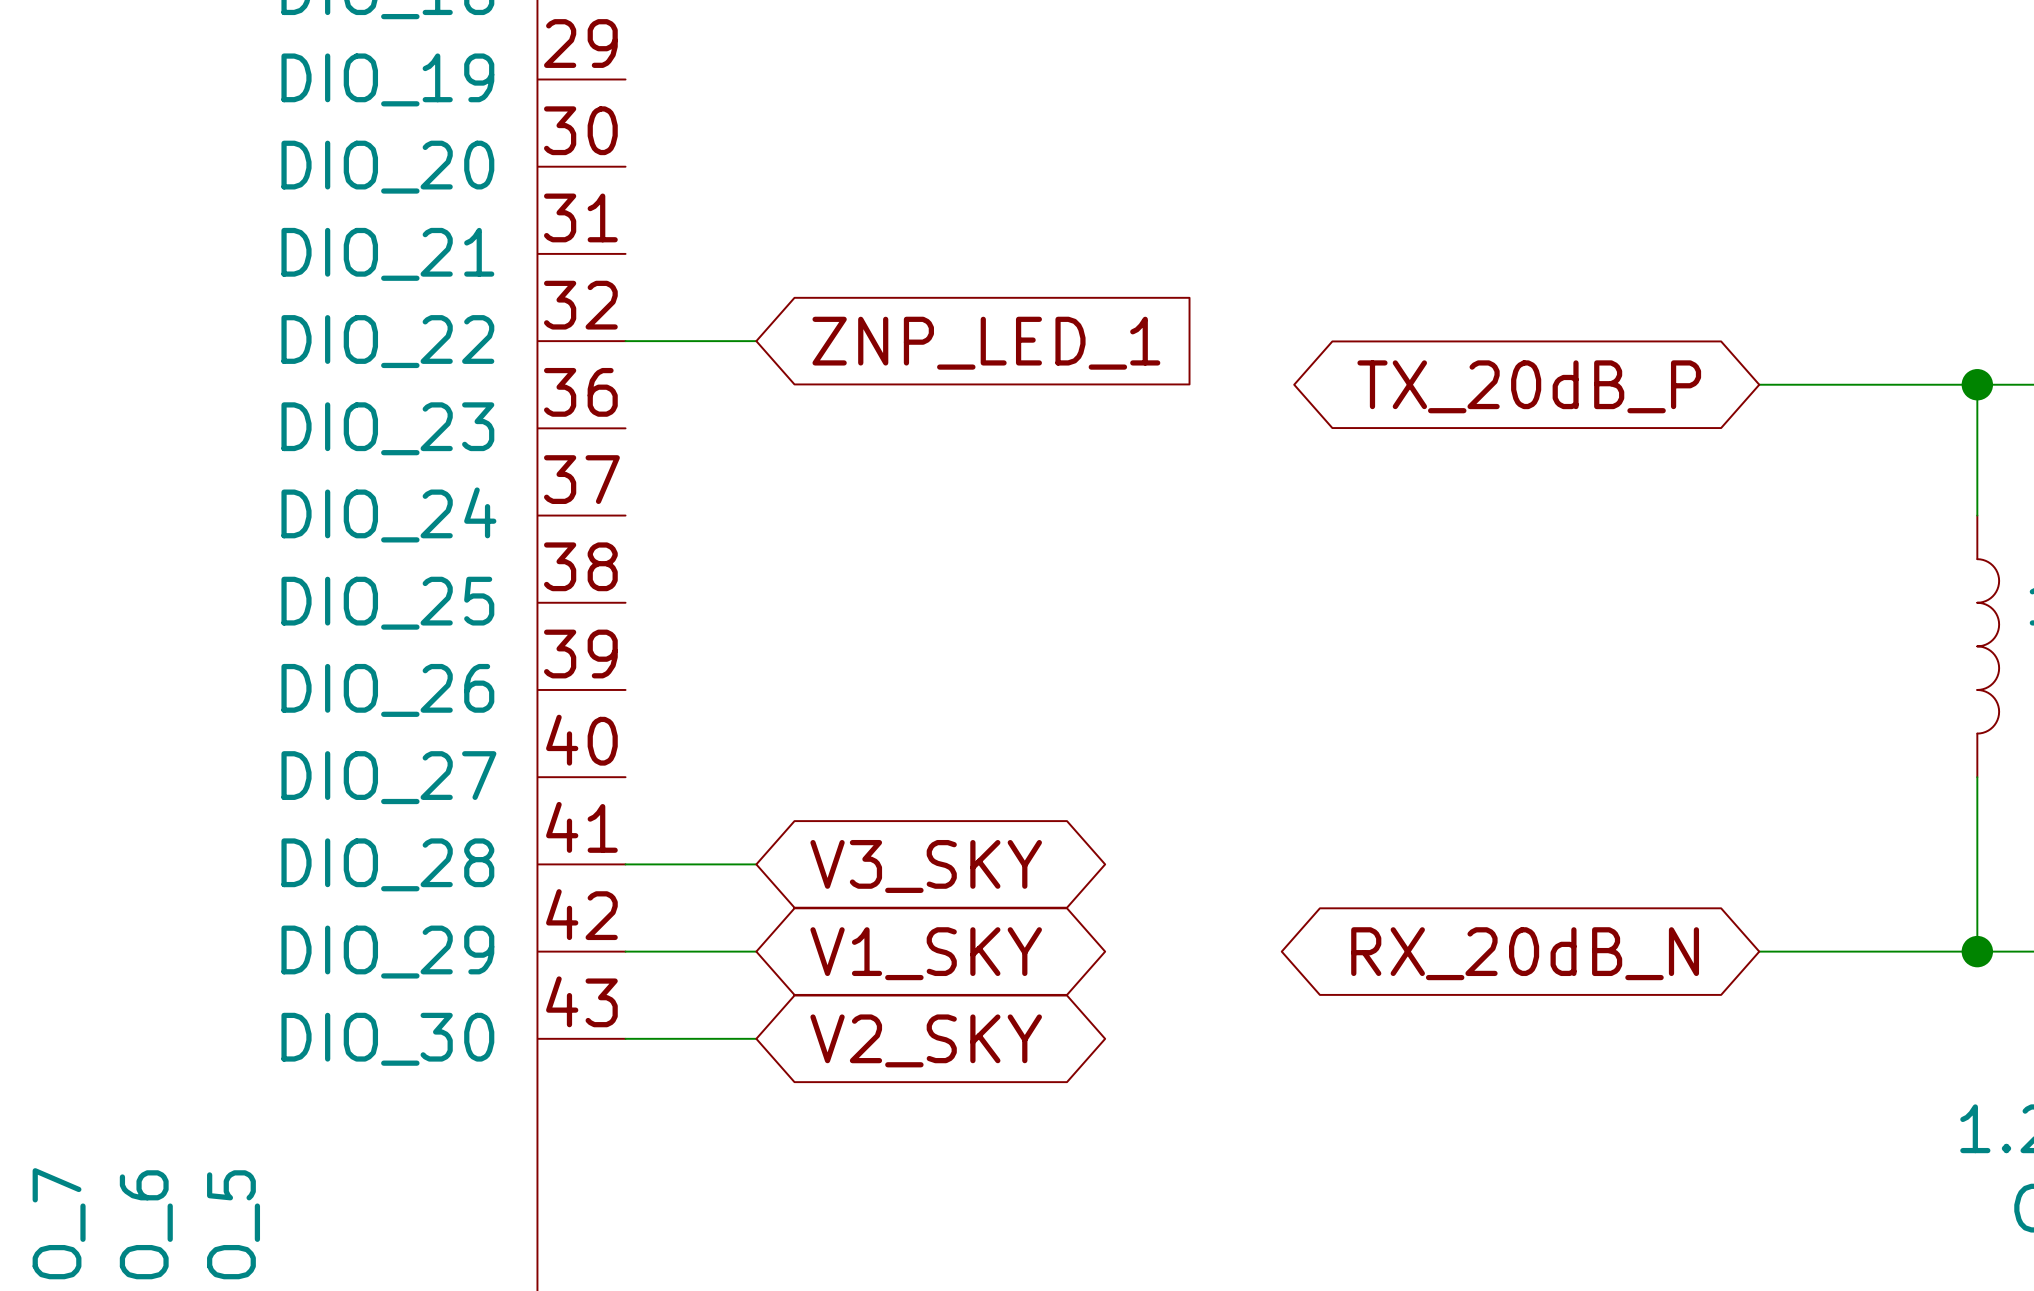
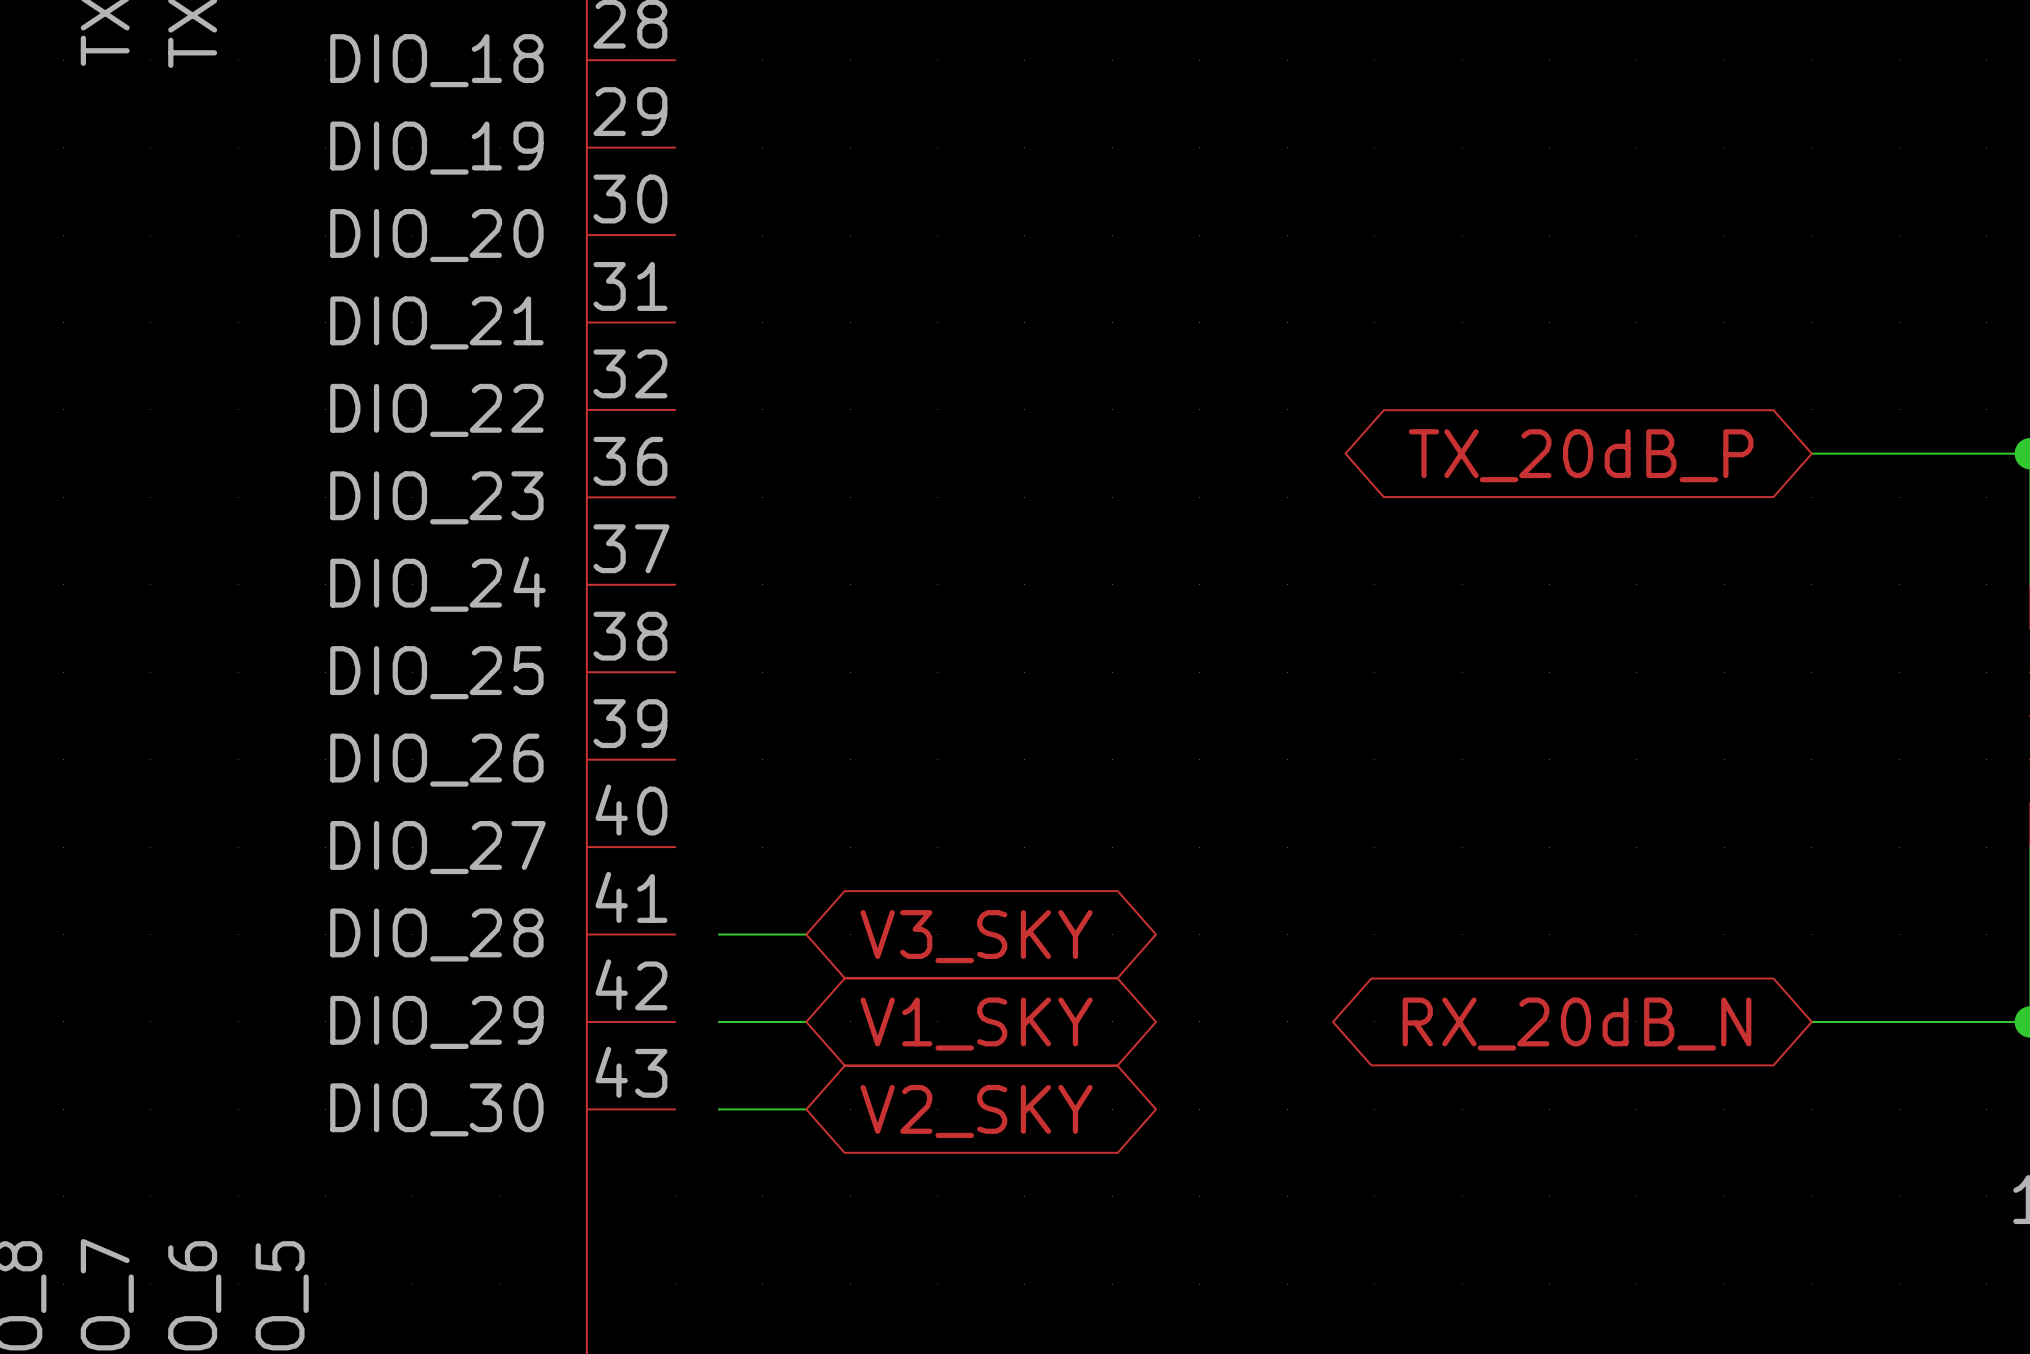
wire: (625, 341) (756, 341) -> none
global label: ZNP_LED_1 (986, 343) -> none
wire: (625, 864) (669, 864) -> none
wire: (625, 951) (669, 951) -> none
wire: (625, 1038) (669, 1038) -> none

